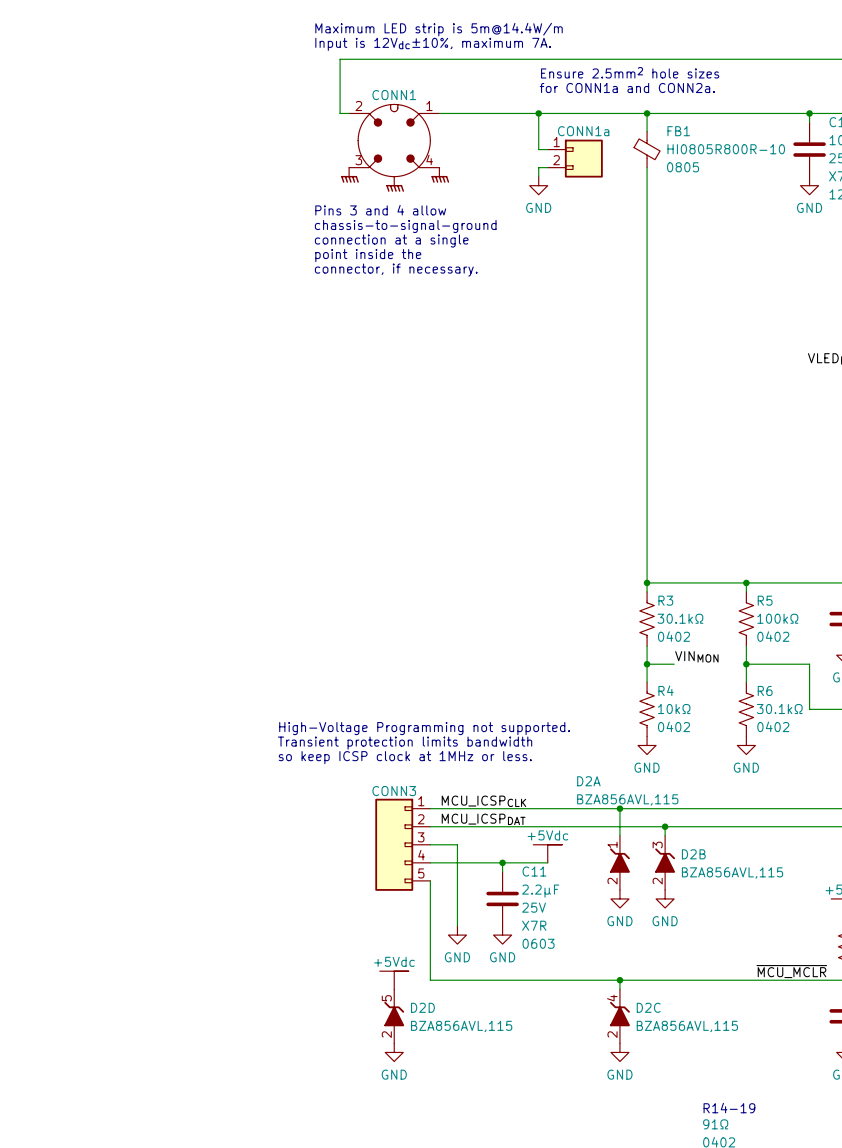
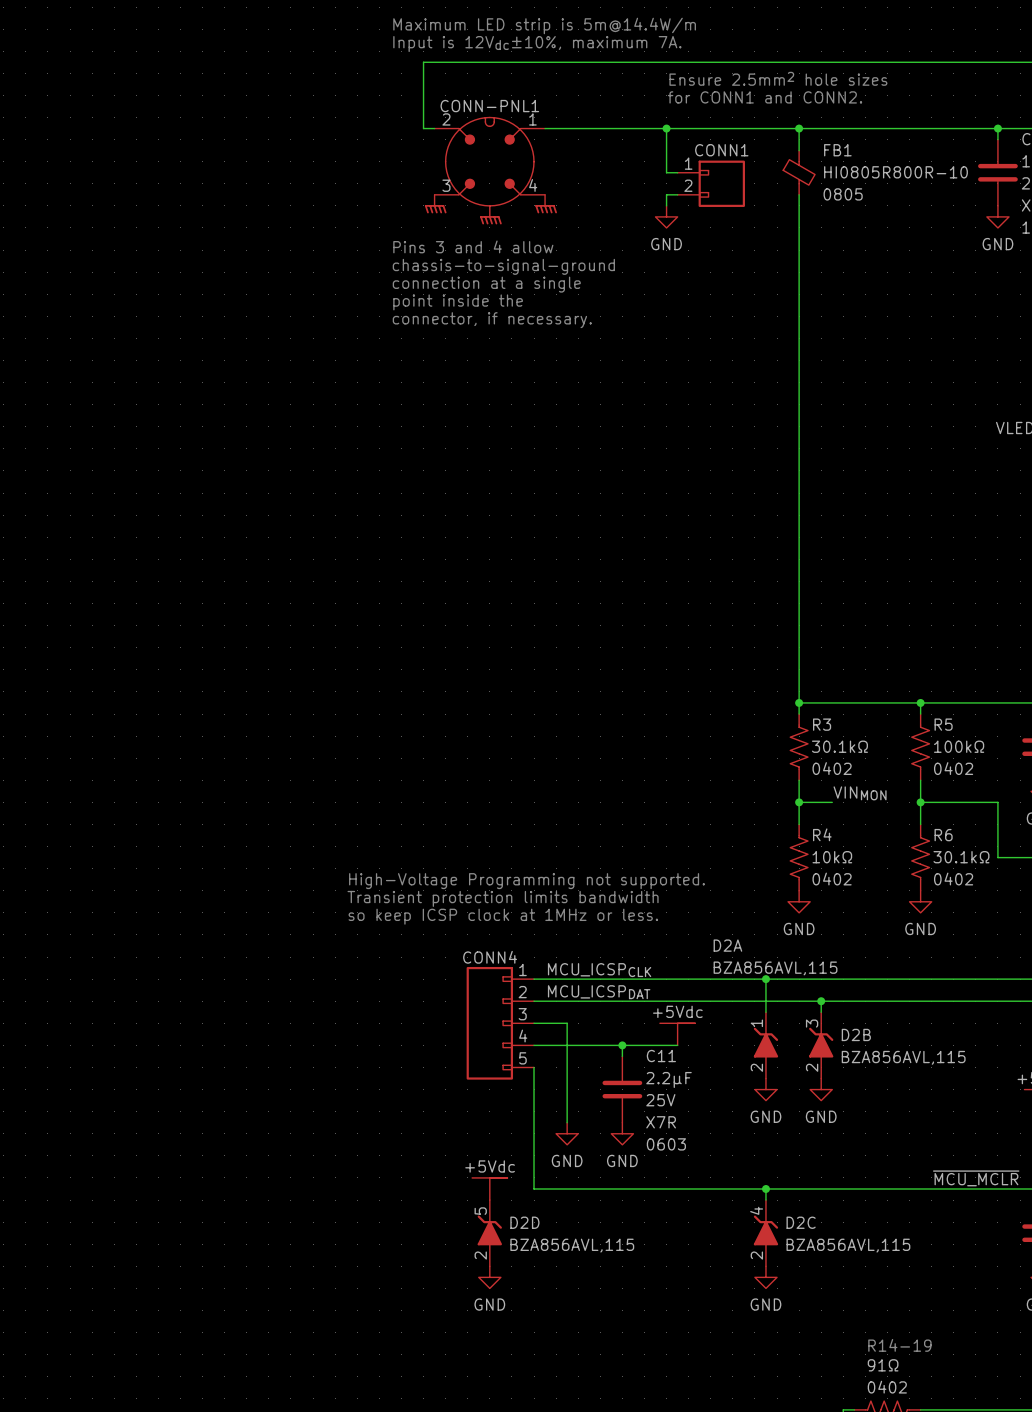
text: for CONN1a and CONN2a. (627, 88) -> for CONN1 and CONN2. (765, 97)
CONN1 name: CONN1 (394, 95) -> CONN-PNL1 (489, 106)
CONN1a name: CONN1a (583, 131) -> CONN1 (721, 150)
CONN3 name: CONN3 (394, 791) -> CONN4 (490, 957)

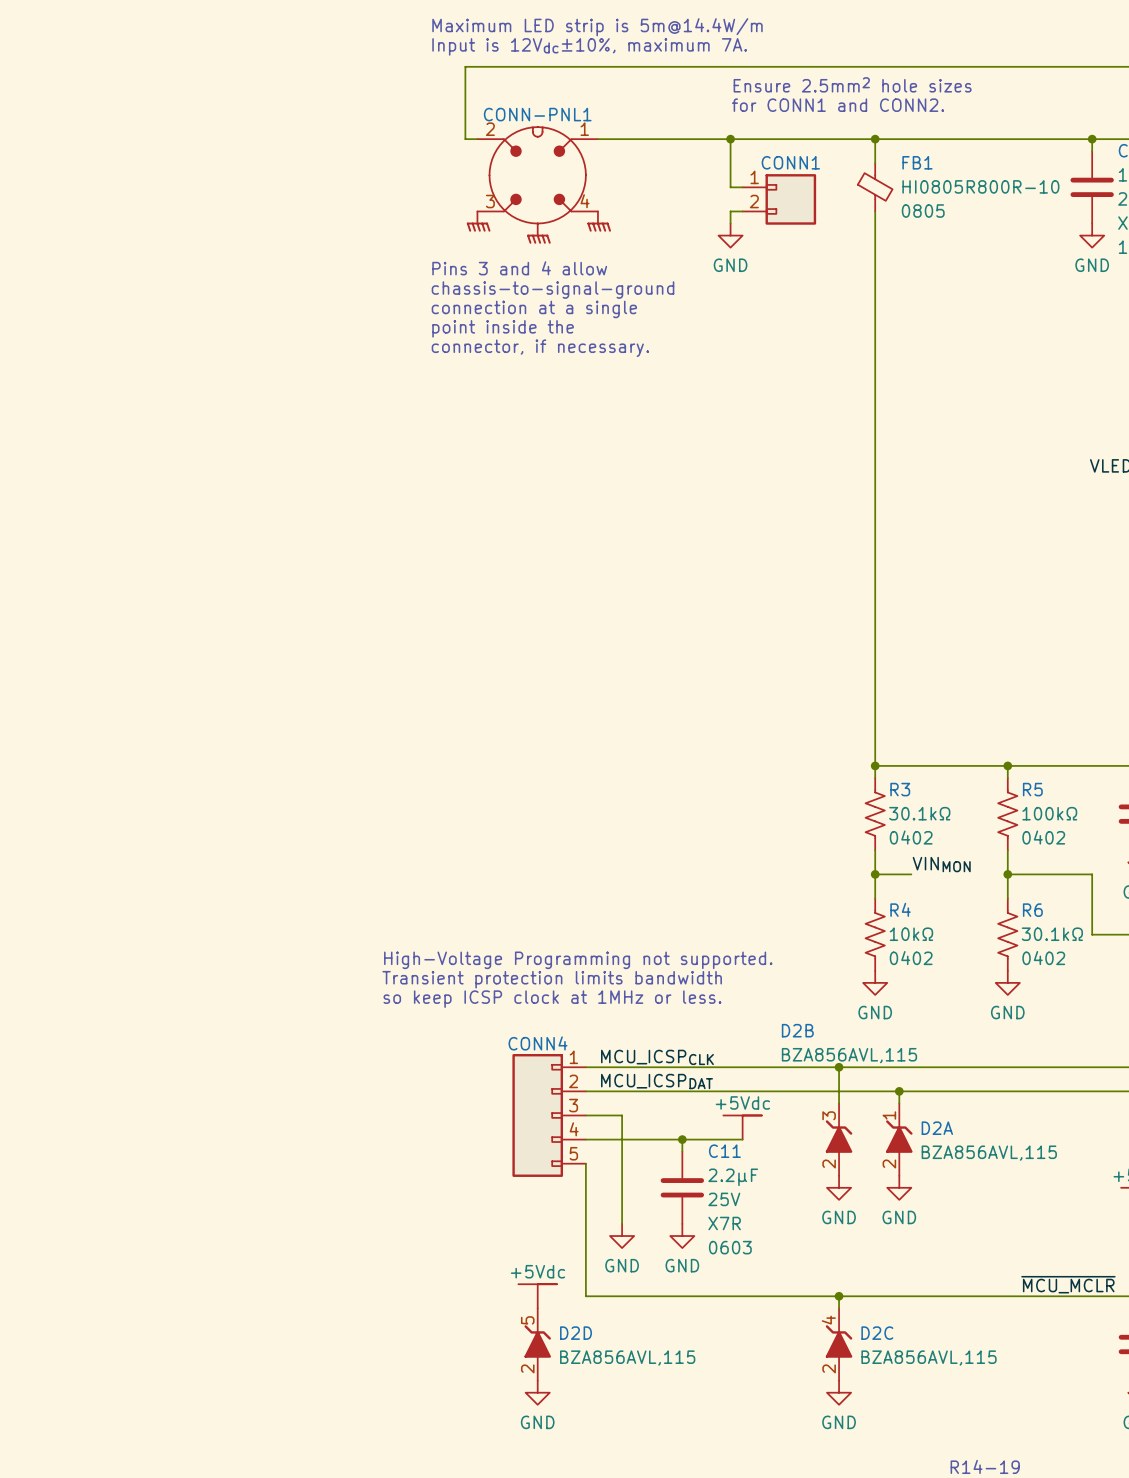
D2A name position: D2A (727, 945) -> D2A (937, 1128)
D2B name position: D2B (856, 1034) -> D2B (797, 1030)
D2A position: (765, 1045) -> (899, 1139)
D2B position: (821, 1045) -> (839, 1139)

